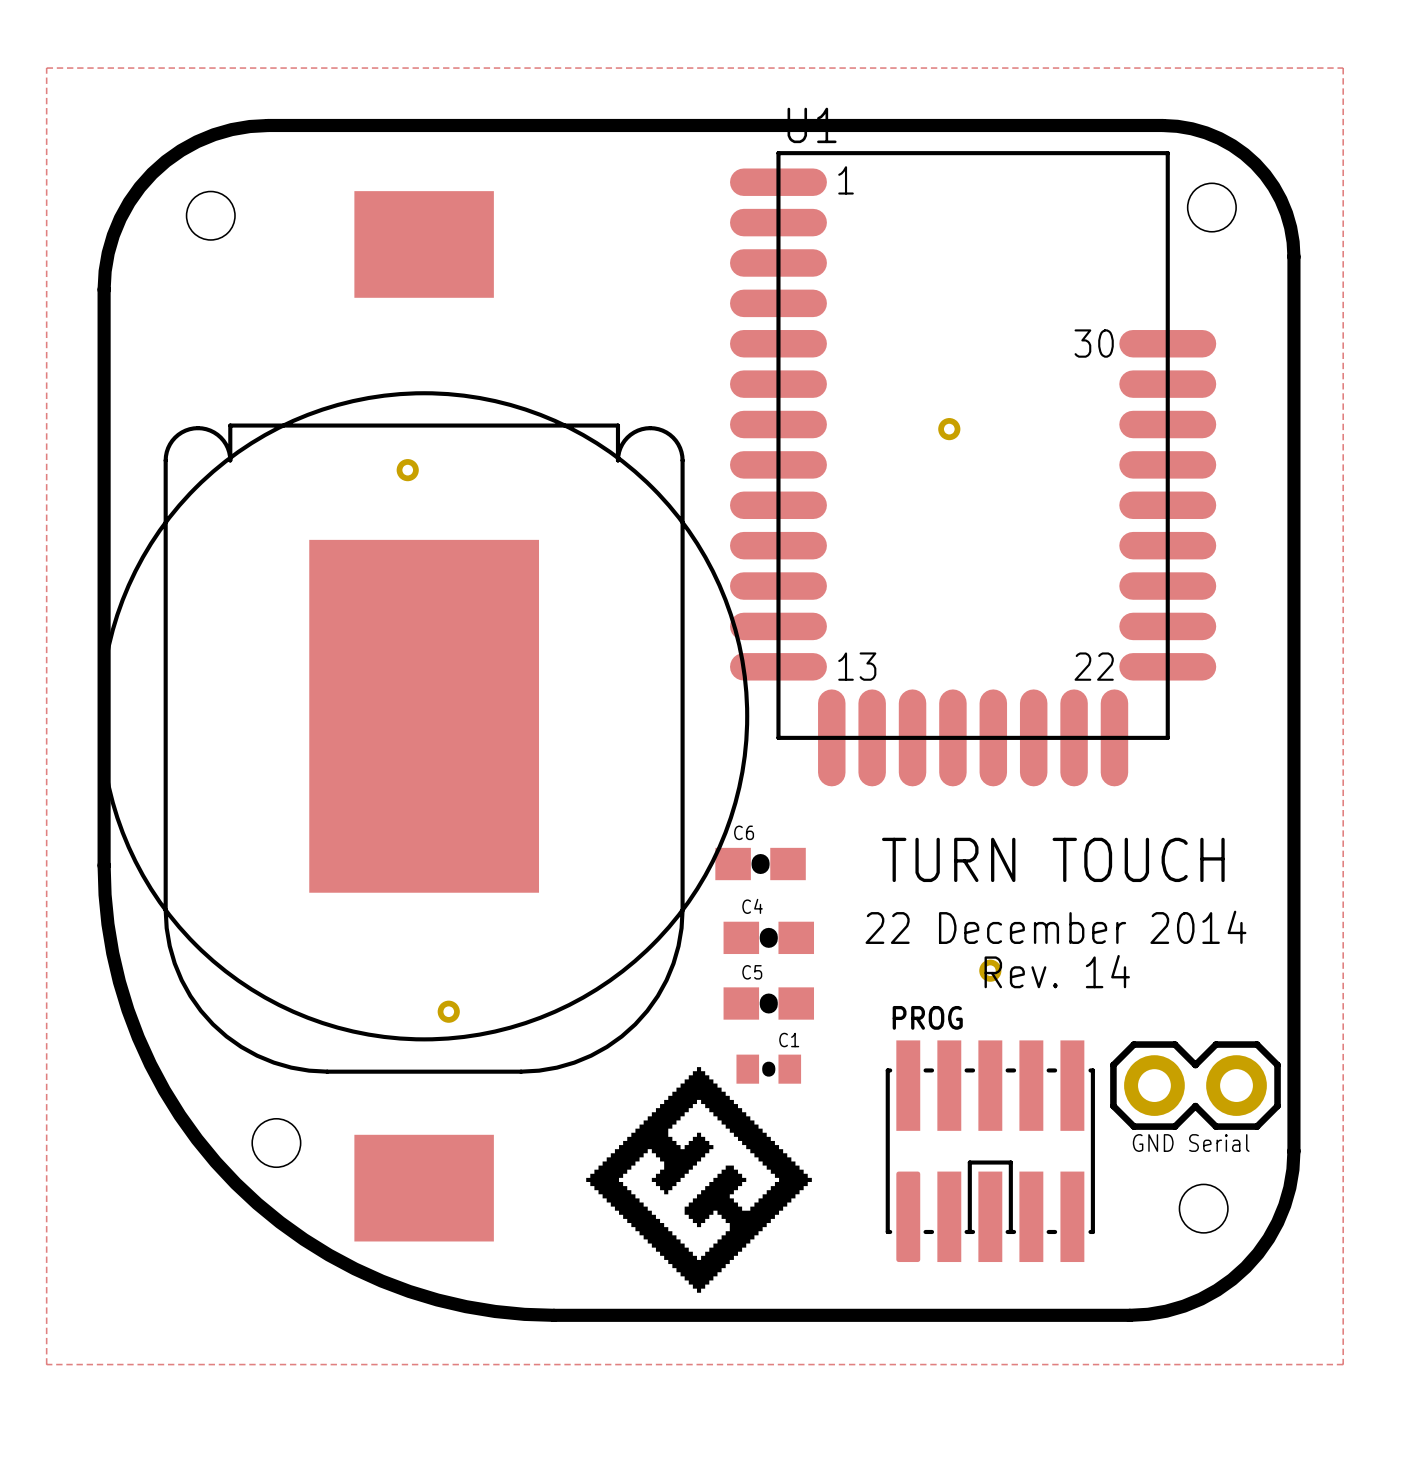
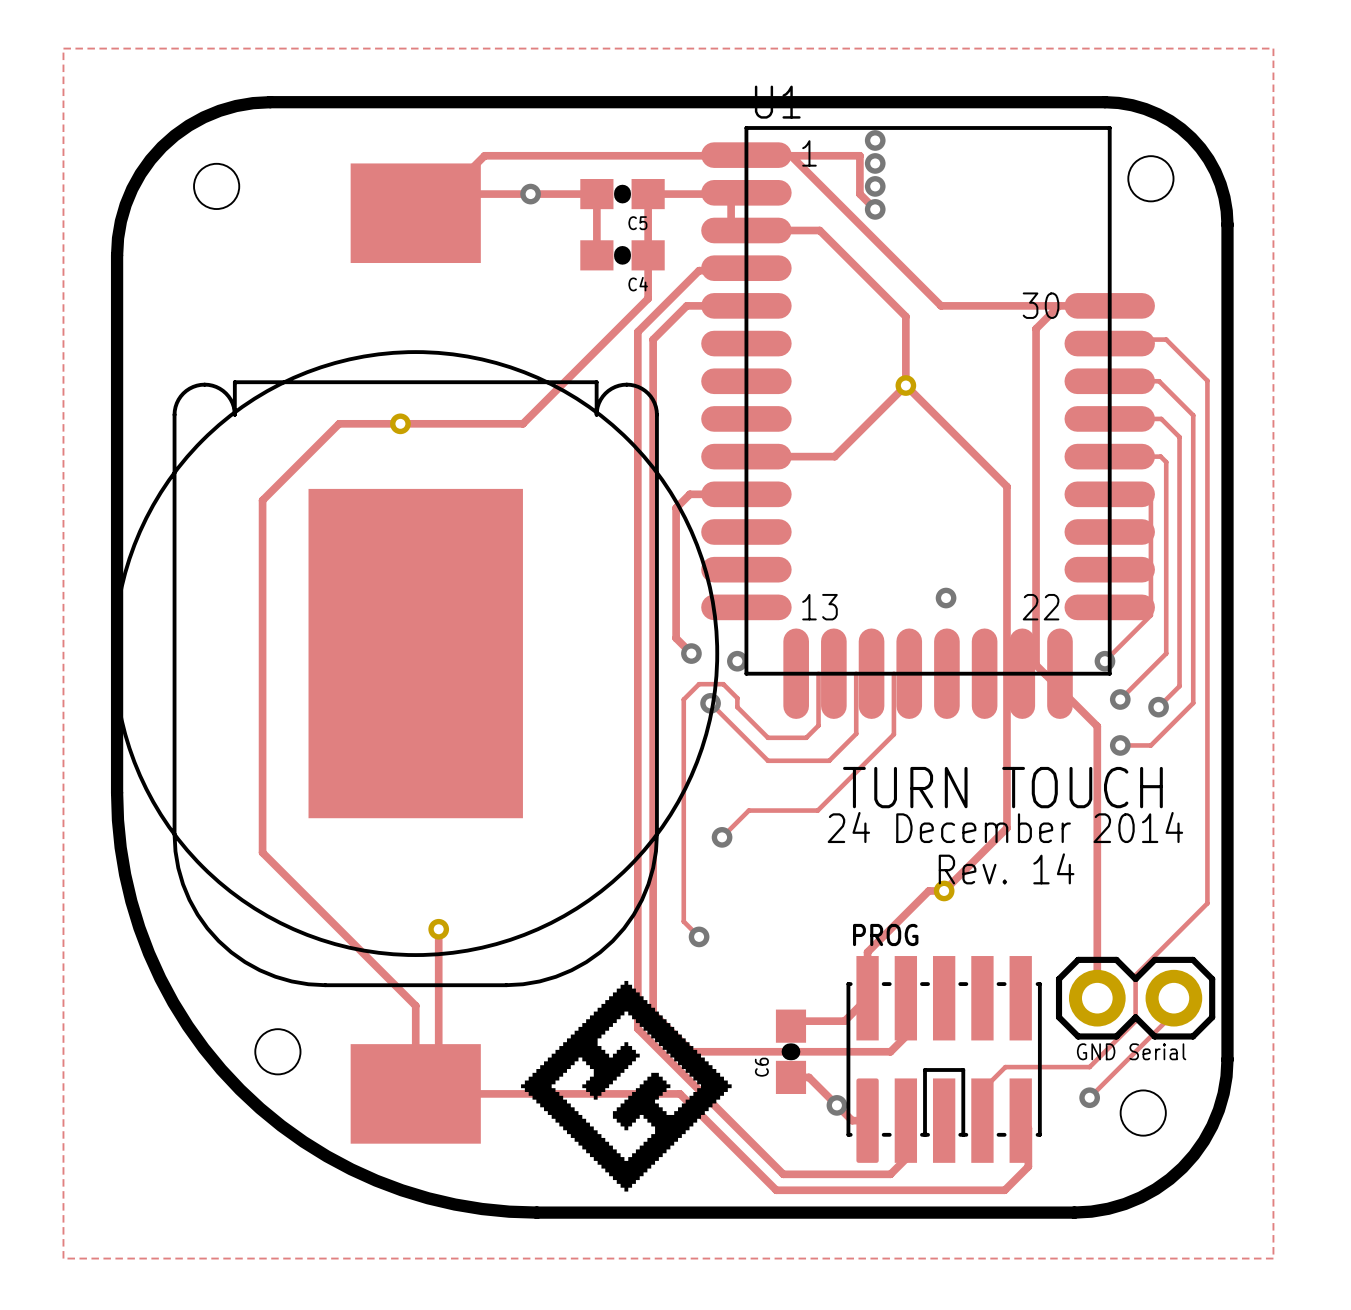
via: none -> (875, 140)
track: none -> (790, 155) (941, 305) (1094, 305)
via: none -> (875, 163)
via: none -> (875, 186)
via: none -> (530, 194)
track: none -> (875, 209) (859, 194) (859, 155) (484, 155) (427, 213) (415, 213) (434, 194) (596, 194) (596, 255)
via: none -> (875, 209)
track: none -> (731, 268) (743, 270) (699, 270) (637, 331) (637, 1028) (783, 1174) (890, 1174) (905, 1158) (905, 1120)
track: none -> (731, 305) (686, 305) (653, 339) (653, 1013) (691, 1051) (890, 1051) (905, 1036) (905, 998)
track: none -> (1059, 305) (1036, 328) (1036, 665) (1097, 726) (1097, 998)
track: none -> (1094, 343) (1113, 339) (1166, 339) (1207, 380) (1207, 903) (1135, 975) (1135, 1021) (1089, 1067) (1005, 1067) (982, 1090) (982, 1120)
track: none -> (1094, 381) (1159, 381) (1193, 415) (1193, 703) (1150, 745) (1120, 745)
track: none -> (905, 385) (905, 316) (819, 230) (731, 230) (731, 192) (745, 194) (648, 194) (648, 298) (522, 423) (339, 423) (262, 500) (262, 852) (415, 1005) (415, 1093)
track: none -> (905, 385) (834, 456) (731, 456)
track: none -> (905, 385) (1006, 486) (1006, 828) (944, 890) (928, 890) (867, 952) (867, 998) (844, 1021) (798, 1021) (790, 1026)
track: none -> (1094, 418) (1161, 418) (1179, 437) (1179, 686) (1158, 707)
track: none -> (1094, 456) (1160, 456) (1166, 462) (1166, 653) (1120, 699)
track: none -> (731, 494) (689, 494) (676, 508) (676, 638) (691, 653)
track: none -> (1094, 494) (1144, 494) (1150, 500) (1150, 615) (1104, 661)
via: none -> (946, 598)
via: none -> (691, 653)
via: none -> (737, 661)
via: none -> (1104, 661)
track: none -> (818, 673) (818, 725) (806, 737) (768, 737) (737, 707) (737, 698) (723, 684) (699, 684) (683, 699) (683, 921) (699, 936)
track: none -> (856, 673) (856, 733) (829, 760) (768, 760) (710, 703)
track: none -> (893, 673) (893, 734) (817, 810) (748, 810) (722, 837)
via: none -> (1120, 699)
via: none -> (710, 703)
via: none -> (1158, 707)
via: none -> (1120, 745)
C6 rotation: 0° (760, 864) -> 90° clockwise (790, 1051)
C6 position: (760, 864) -> (790, 1051)
C4 name position: C4 (752, 906) -> C4 (638, 284)
via: none -> (722, 837)
text: 22 December 2014 (1055, 927) -> 24 December 2014 (1005, 827)
C4 position: (768, 937) -> (622, 255)
text position: Rev. 14 (1057, 971) -> Rev. 14 (1006, 868)
C5 name position: C5 (752, 972) -> C5 (637, 223)
C5 position: (768, 1003) -> (622, 194)
track: none -> (438, 929) (438, 1070) (415, 1093)
via: none -> (699, 936)
C1: (768, 1069) -> none
track: none -> (1173, 998) (1173, 1013) (1089, 1097)
track: none -> (790, 1077) (808, 1077) (852, 1120) (867, 1120)
drawing position: (699, 1179) -> (626, 1086)
track: none -> (415, 1093) (679, 1093) (776, 1190) (1004, 1190) (1028, 1166) (1028, 1128) (1020, 1120)
via: none -> (1089, 1097)
via: none -> (836, 1105)

